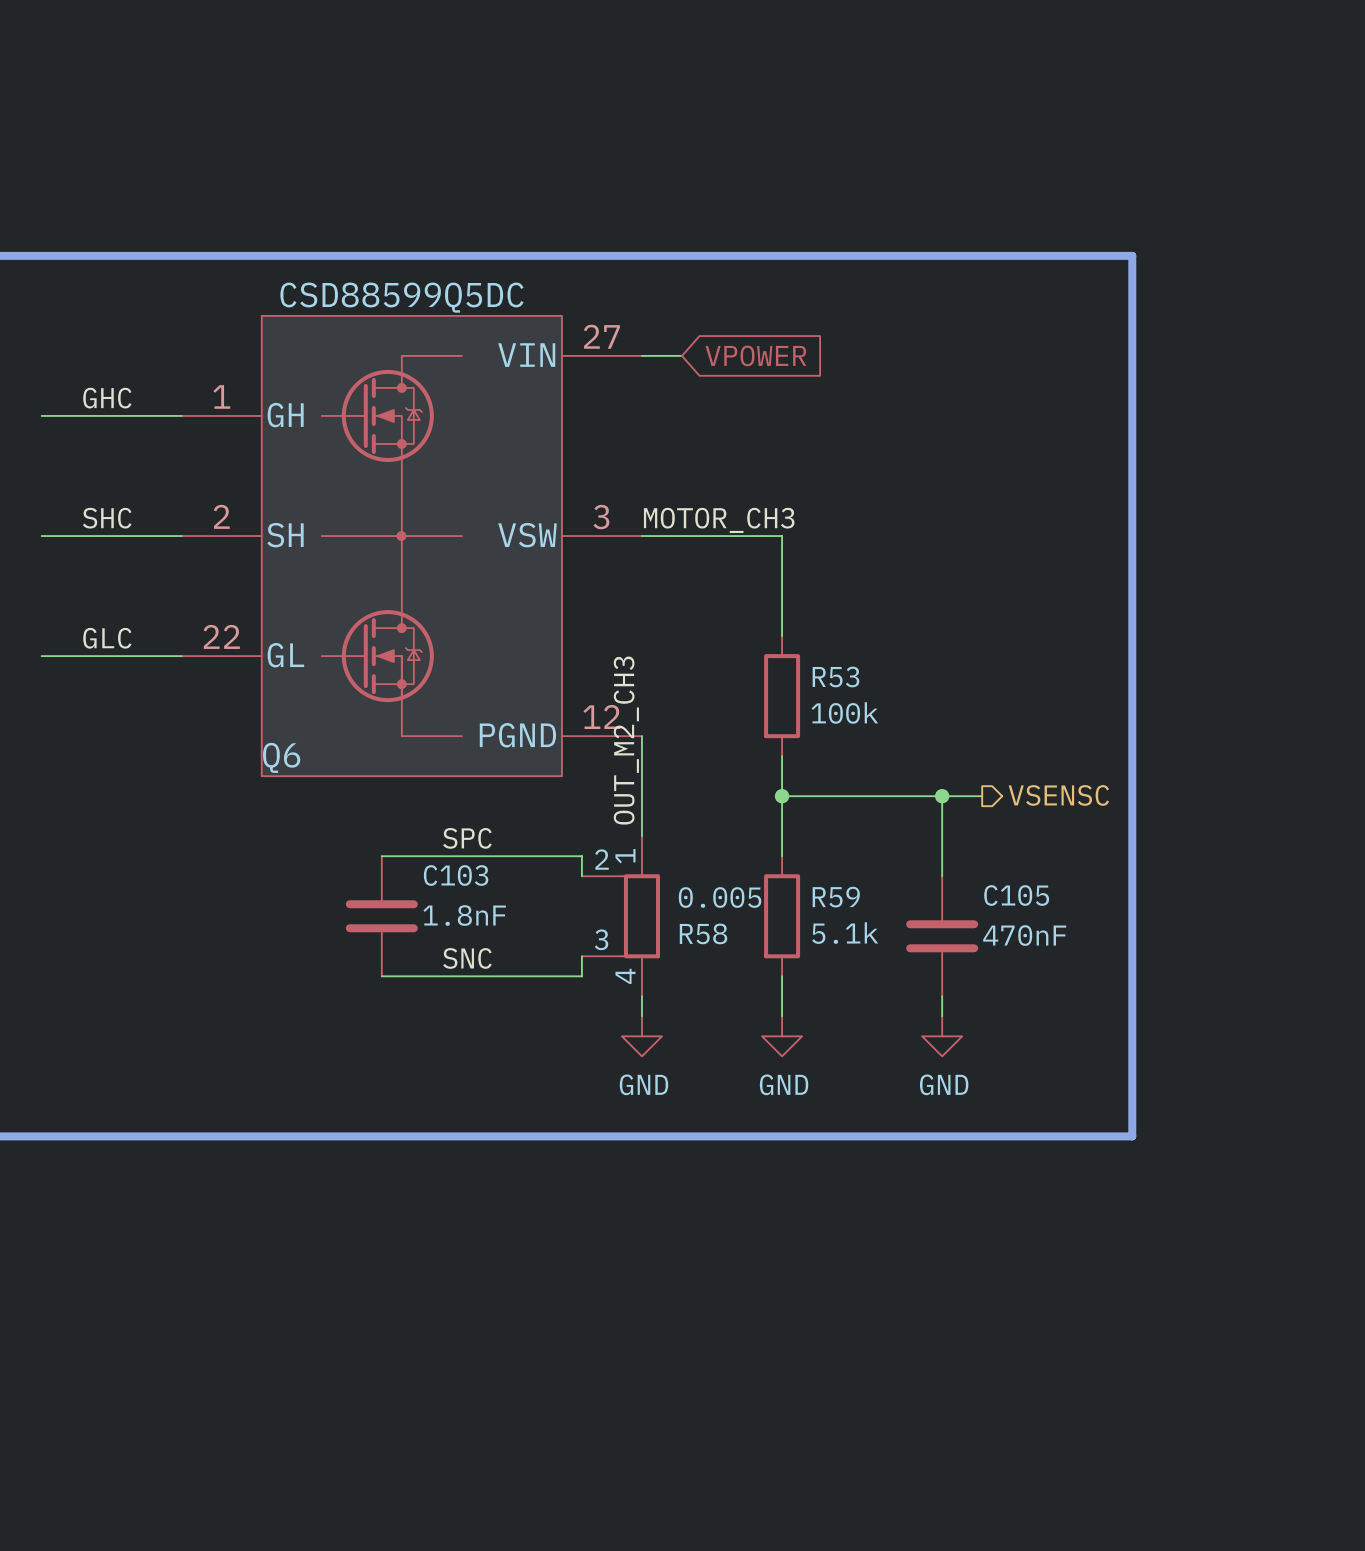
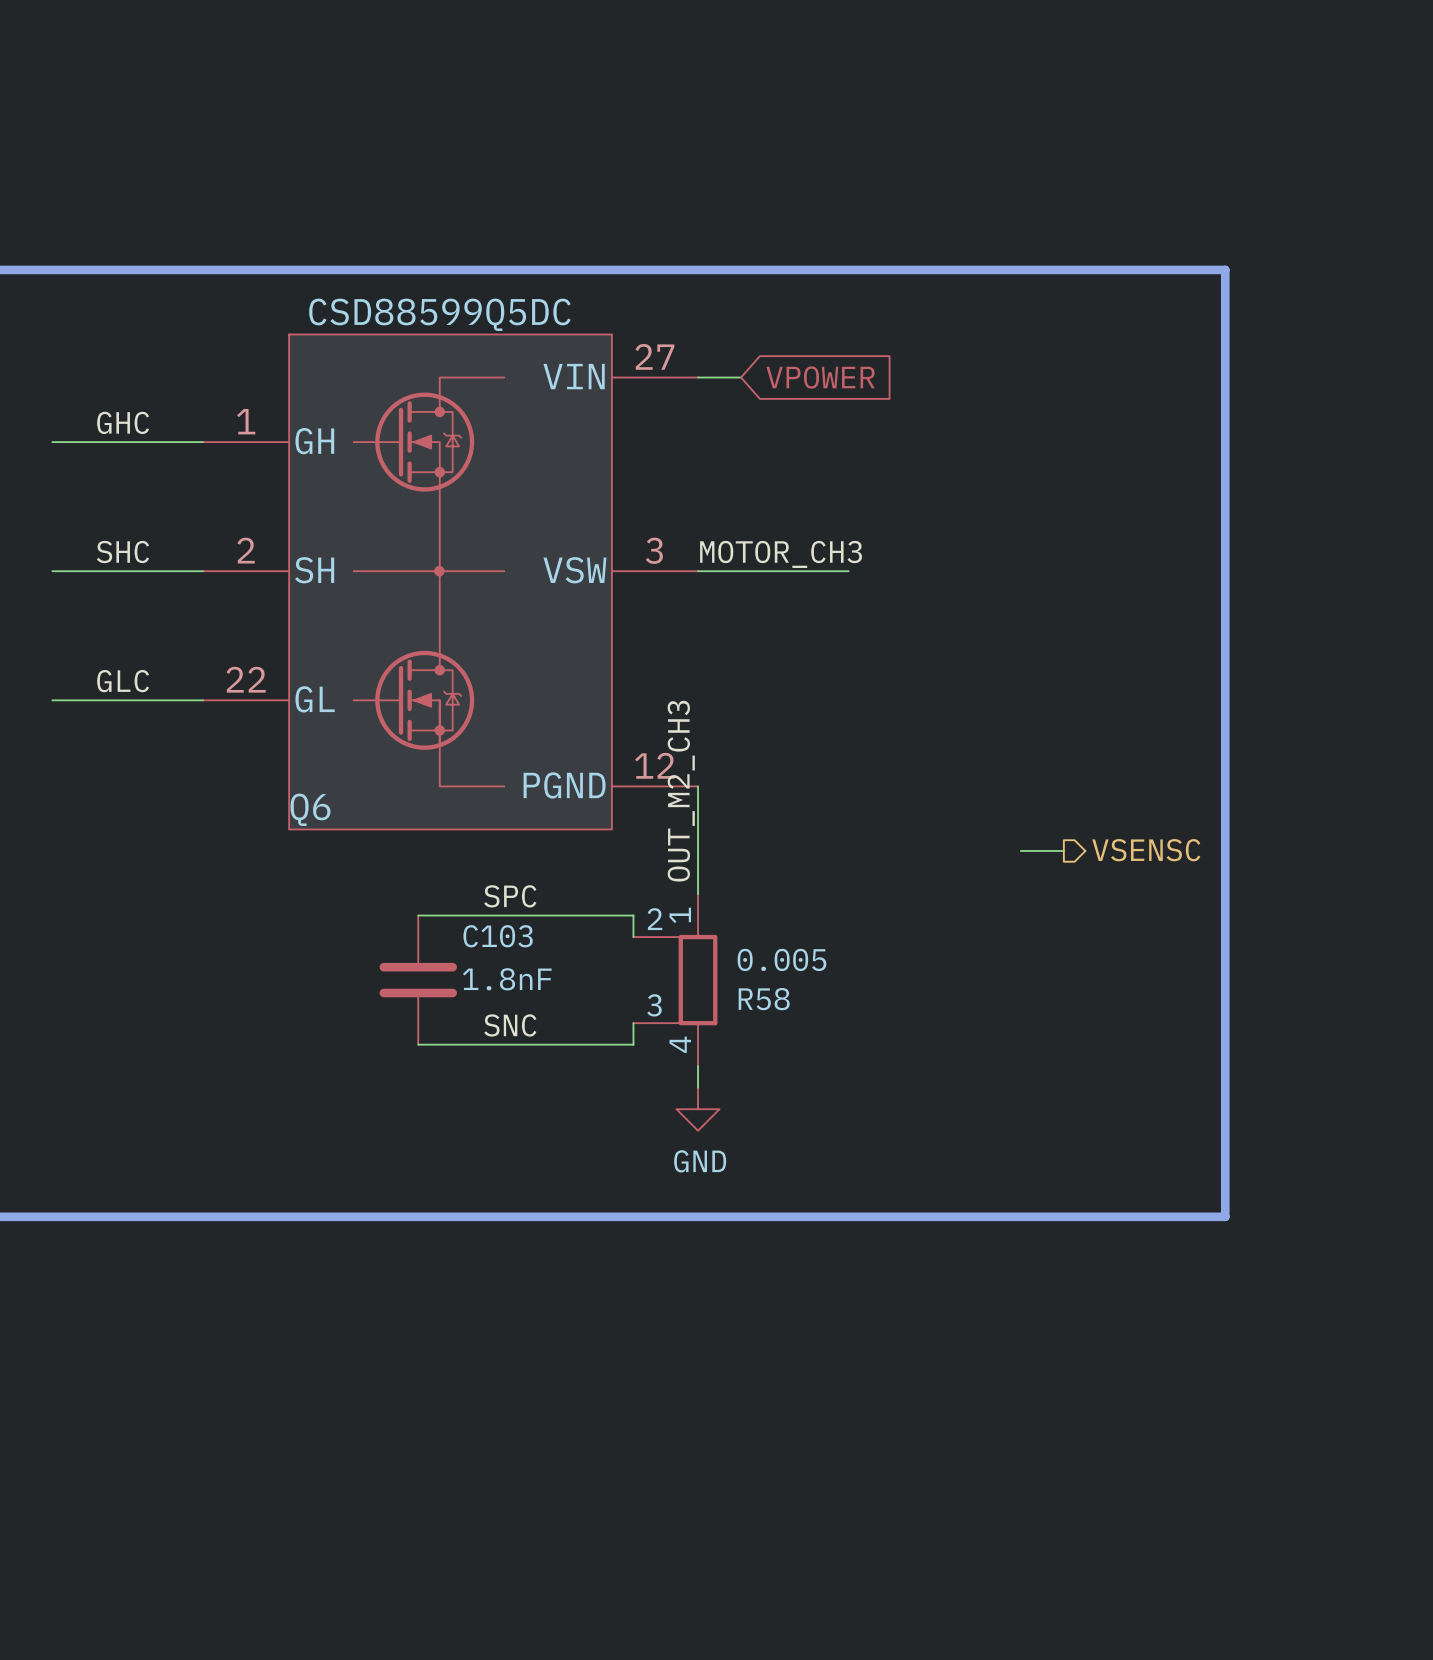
wire: (782, 536) (782, 636) -> none
R53: 100k (782, 696) -> none
wire: (782, 756) (782, 856) -> none
wire: (782, 796) (942, 796) (942, 876) -> none
junction: (782, 796) -> none
junction: (942, 796) -> none
R59: 5.1k (782, 916) -> none
C105: 470nF (942, 936) -> none
wire: (782, 976) (782, 1016) -> none
wire: (942, 996) (942, 1016) -> none
power symbol: GND (782, 1036) -> none
power symbol: GND (942, 1036) -> none

